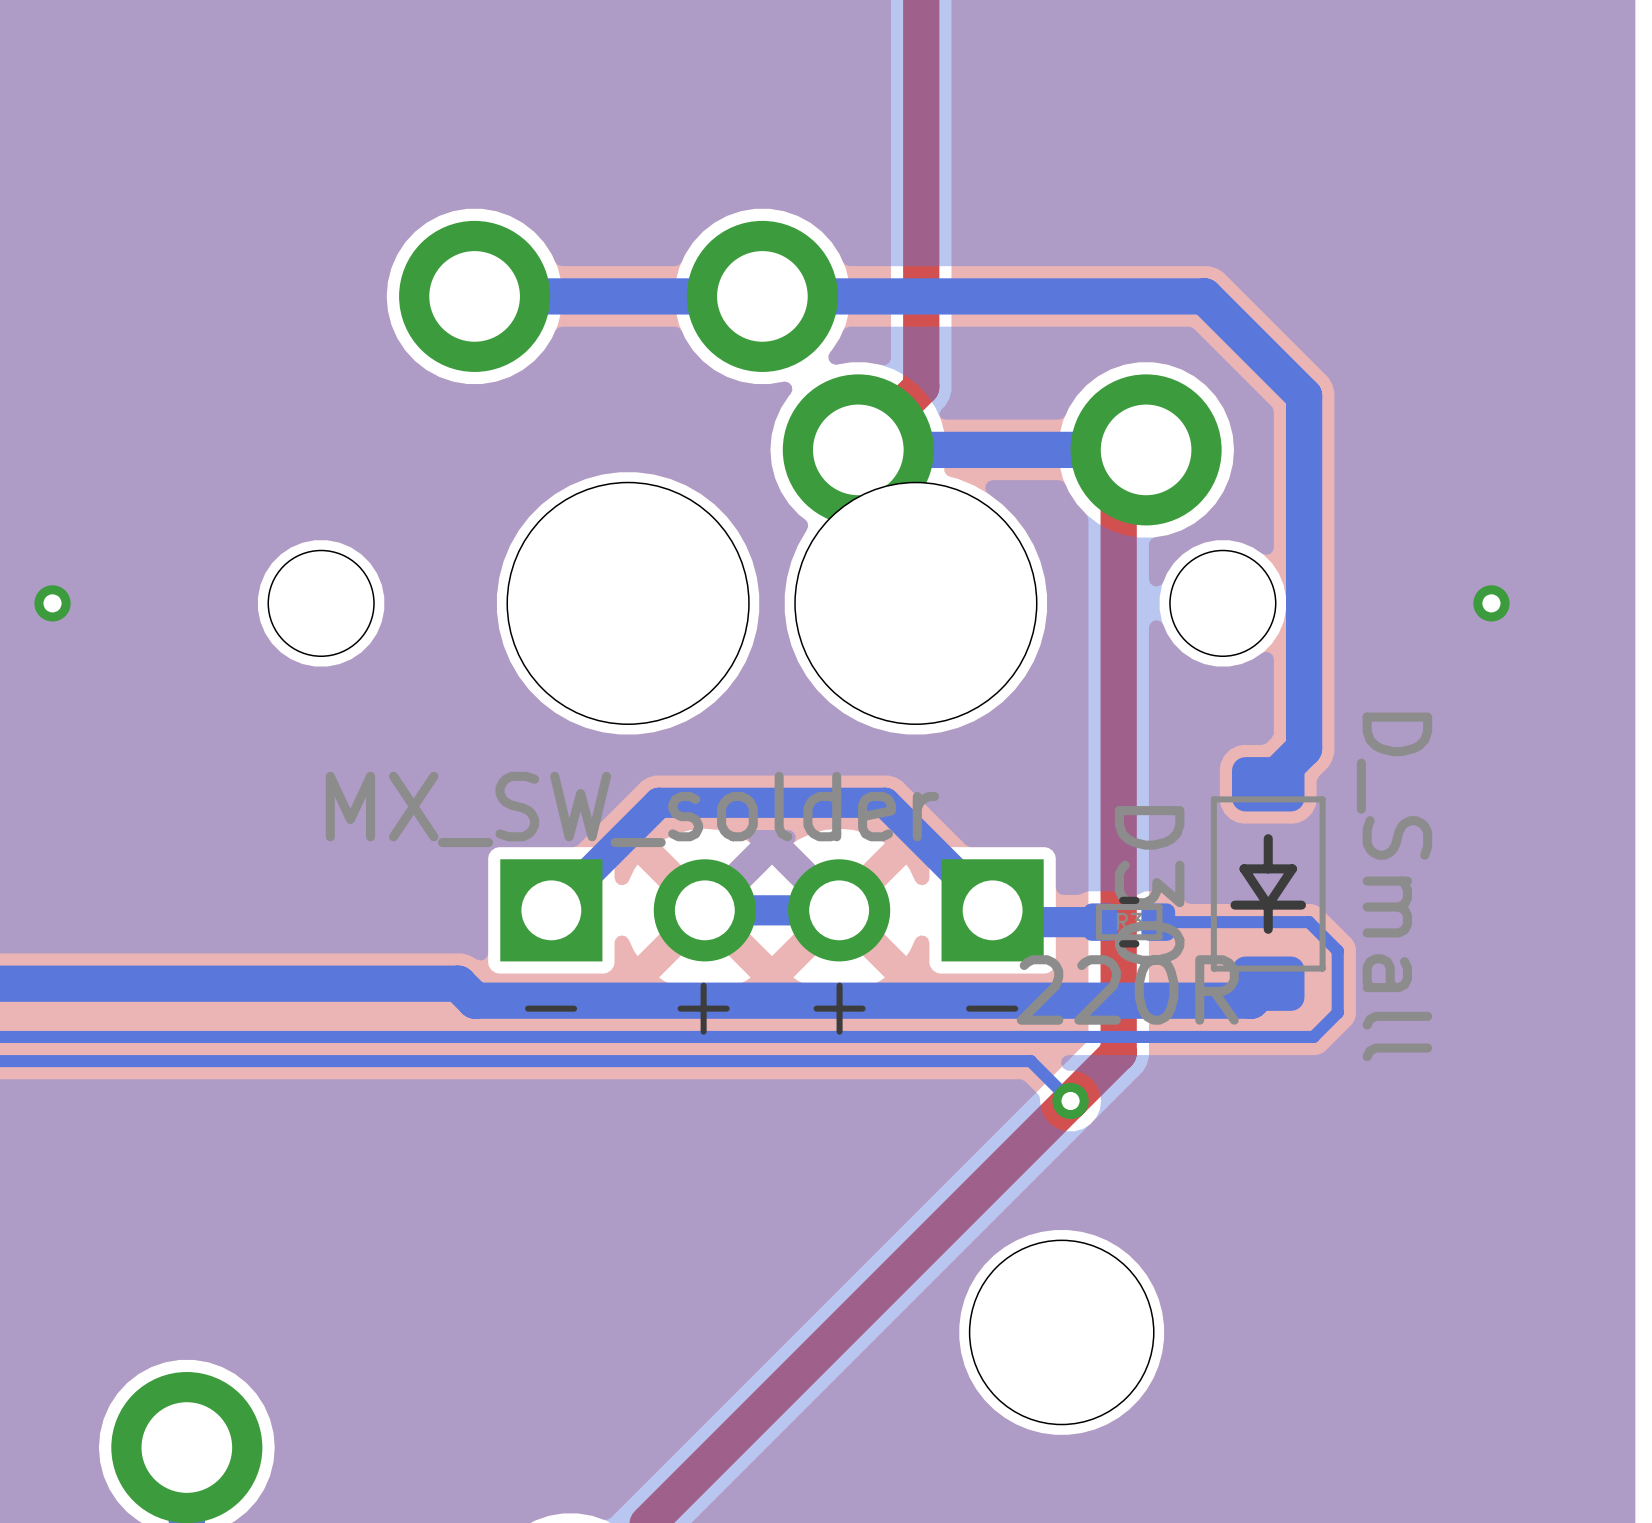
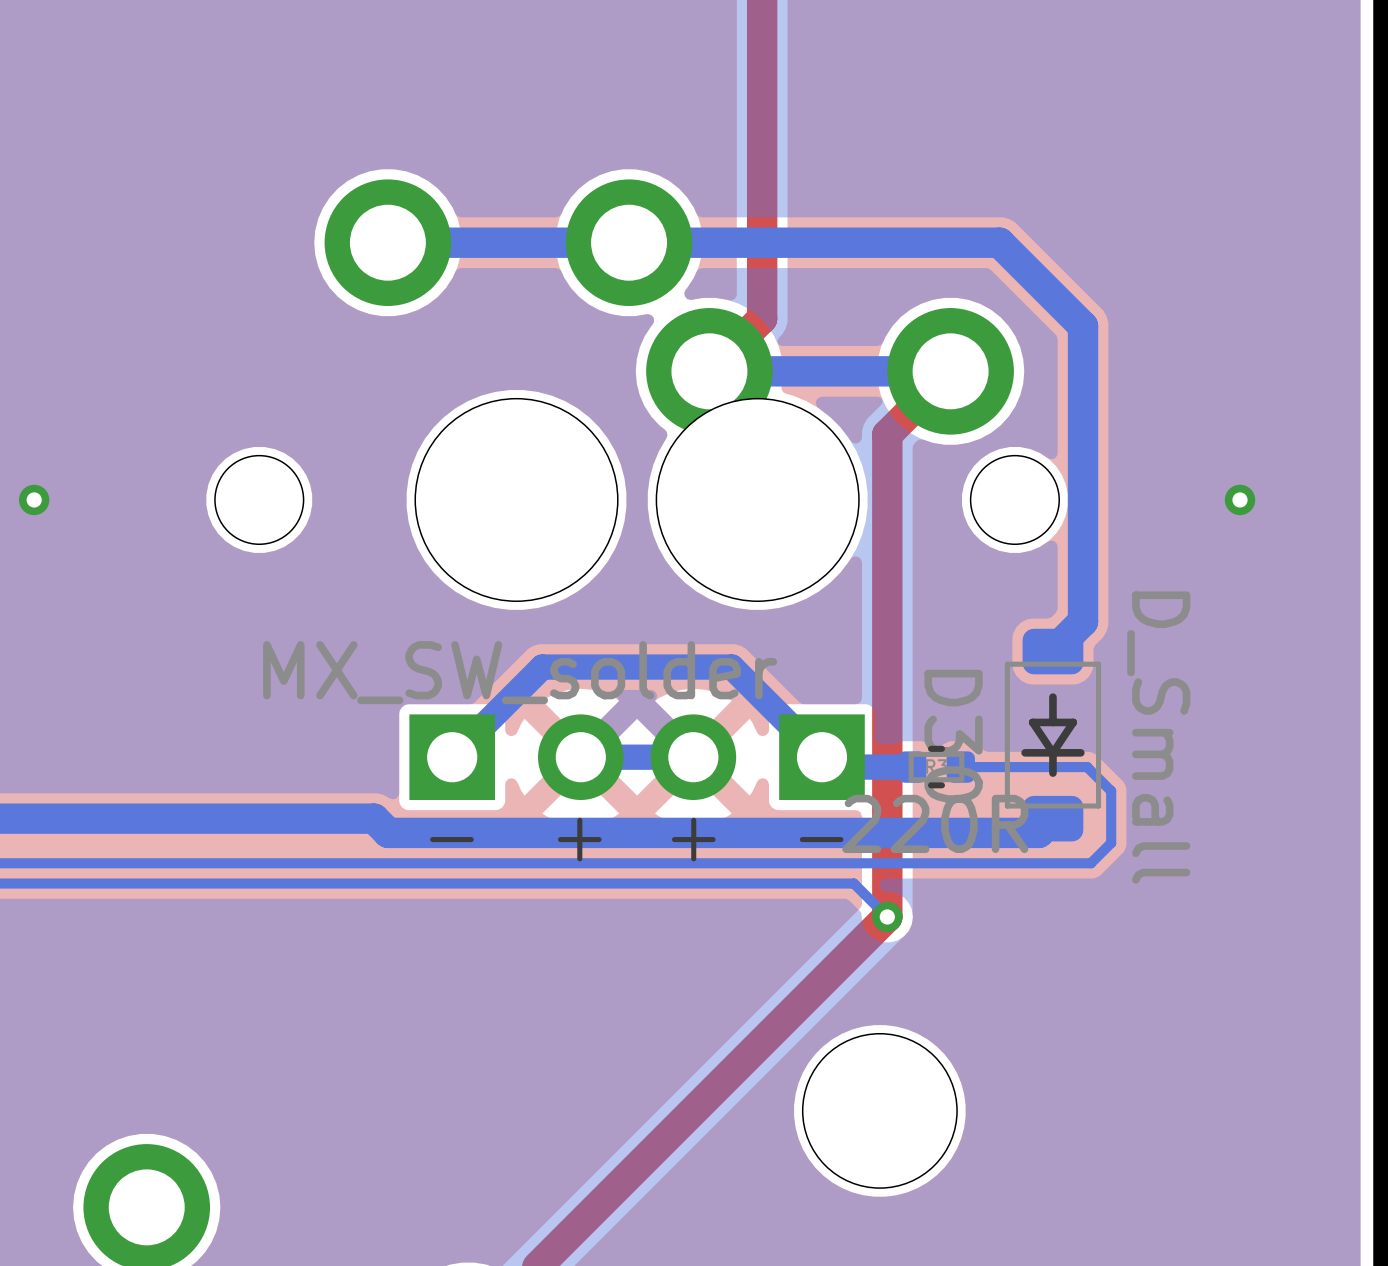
top track: (1118, 477) (1118, 1052) (1070, 1100) -> (927, 394) (887, 434) (887, 916)

